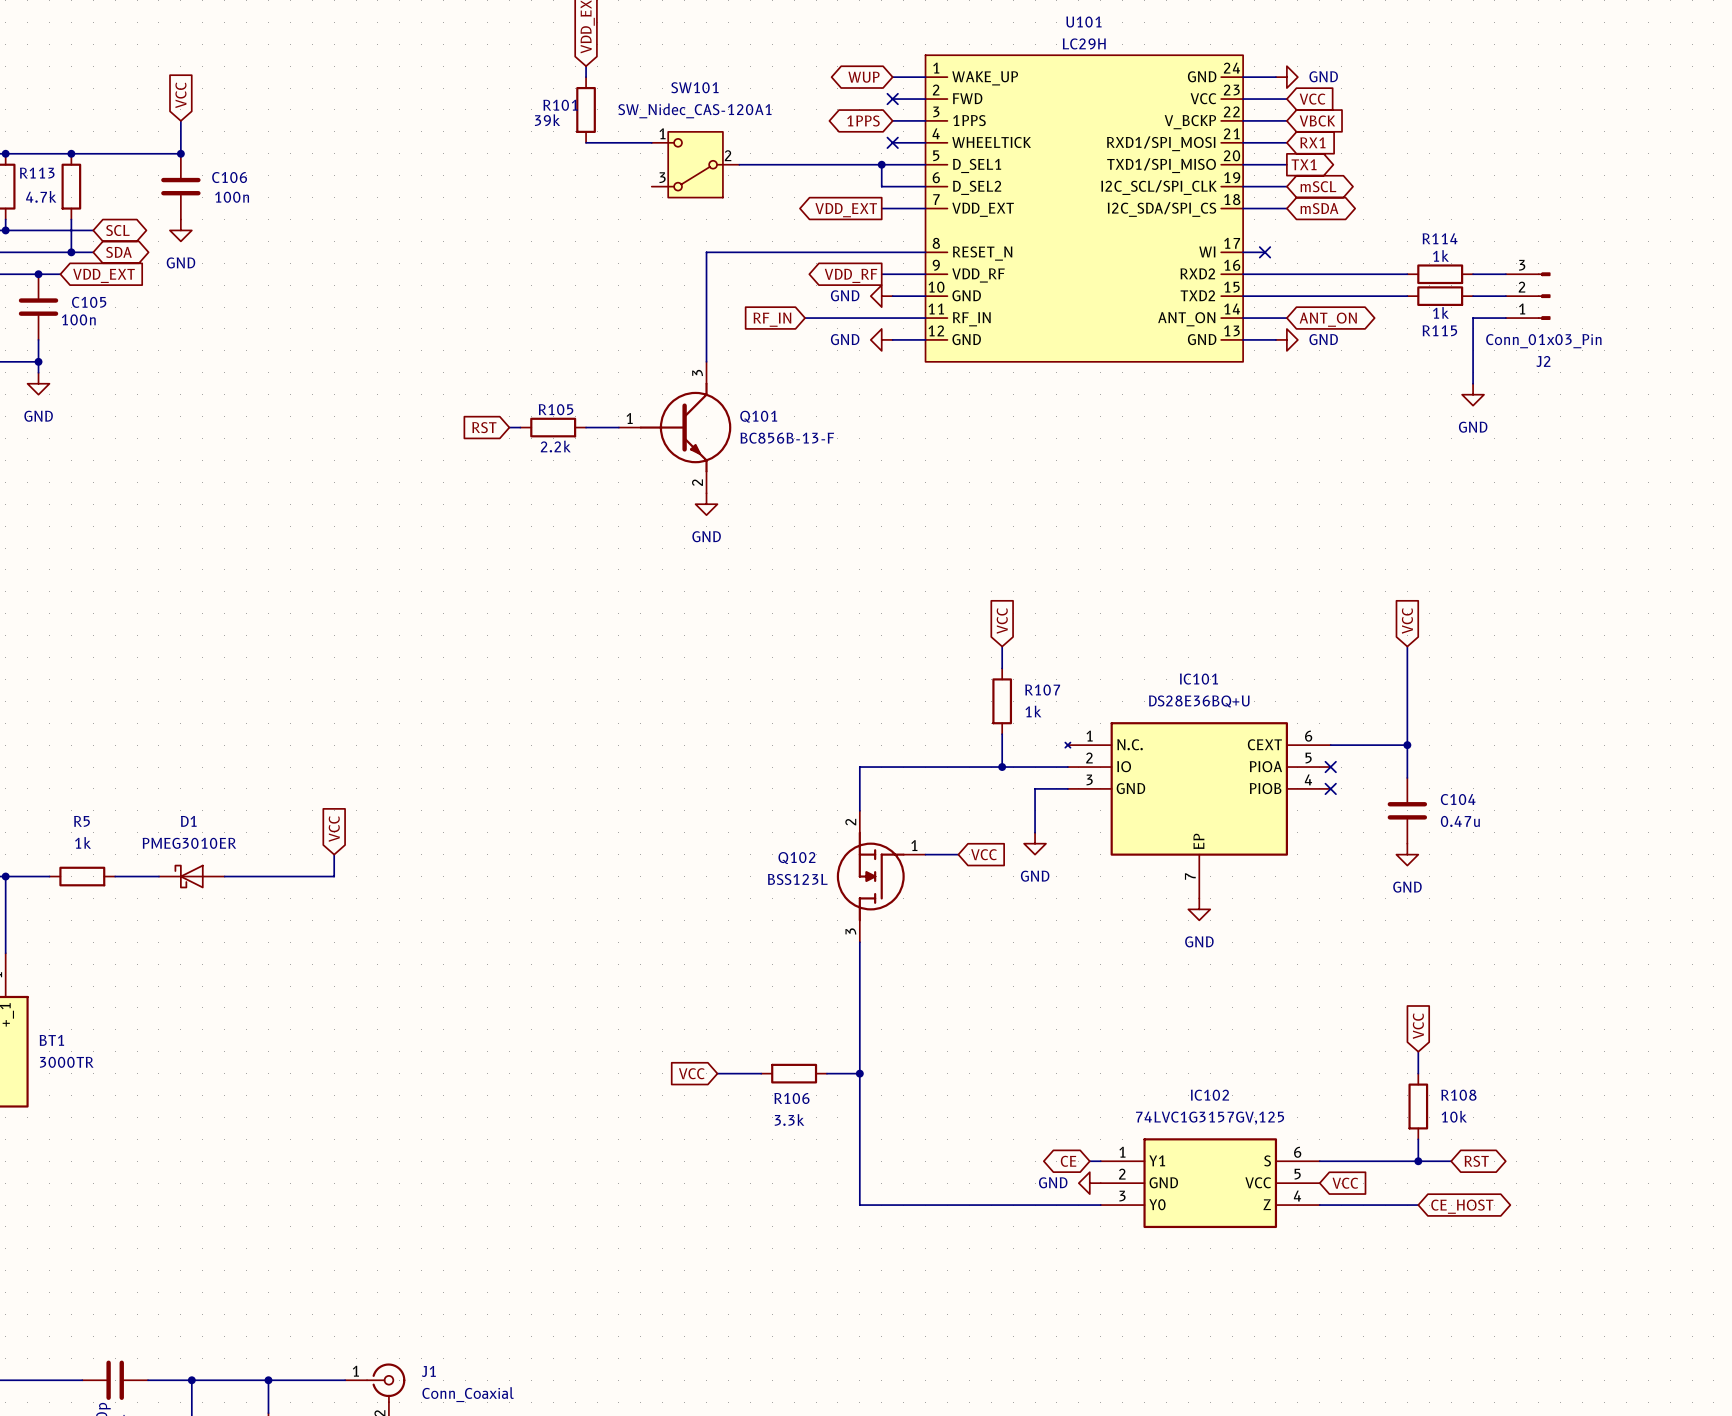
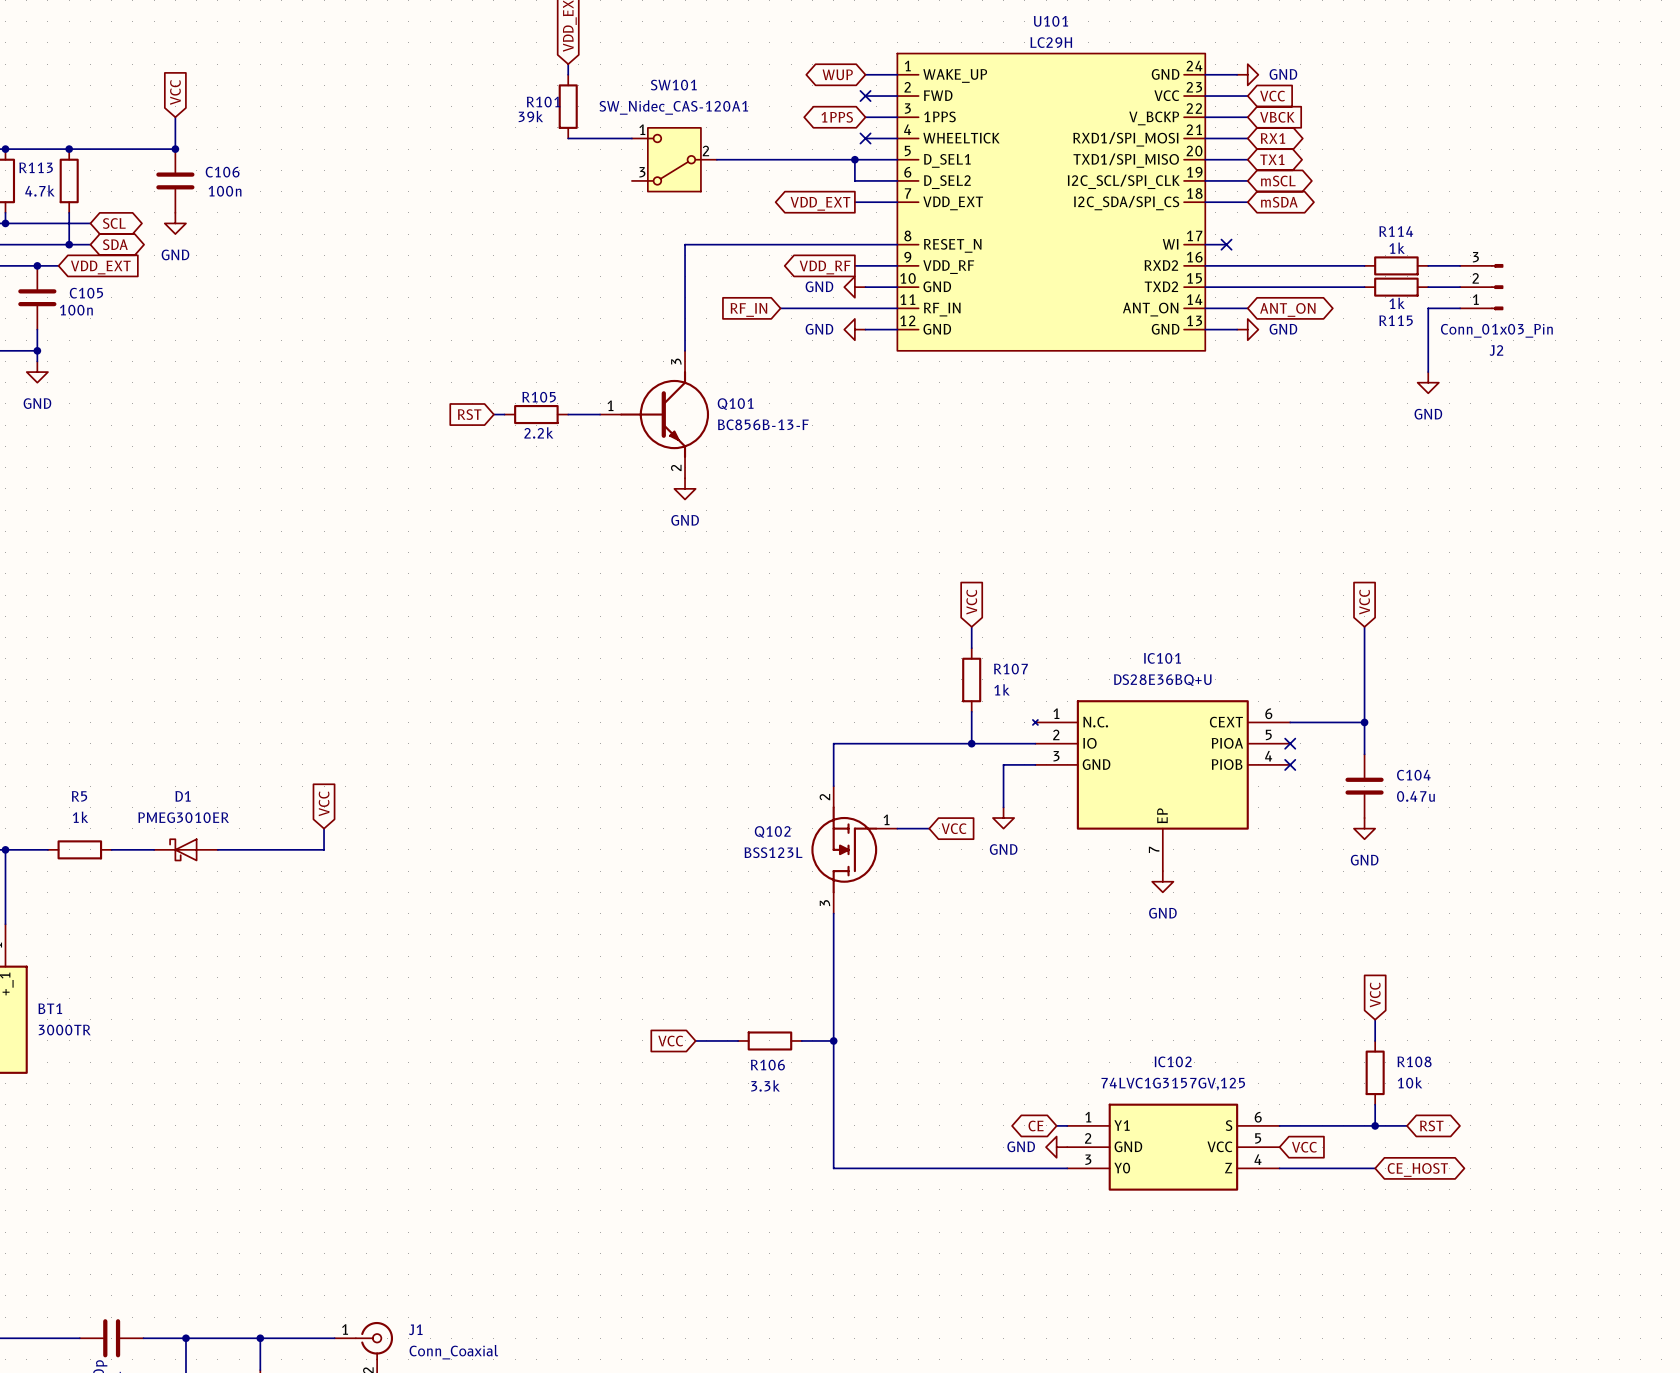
global label shape: input (1312, 142) -> bidirectional (1272, 138)
global label shape: output (1304, 164) -> bidirectional (1272, 159)

